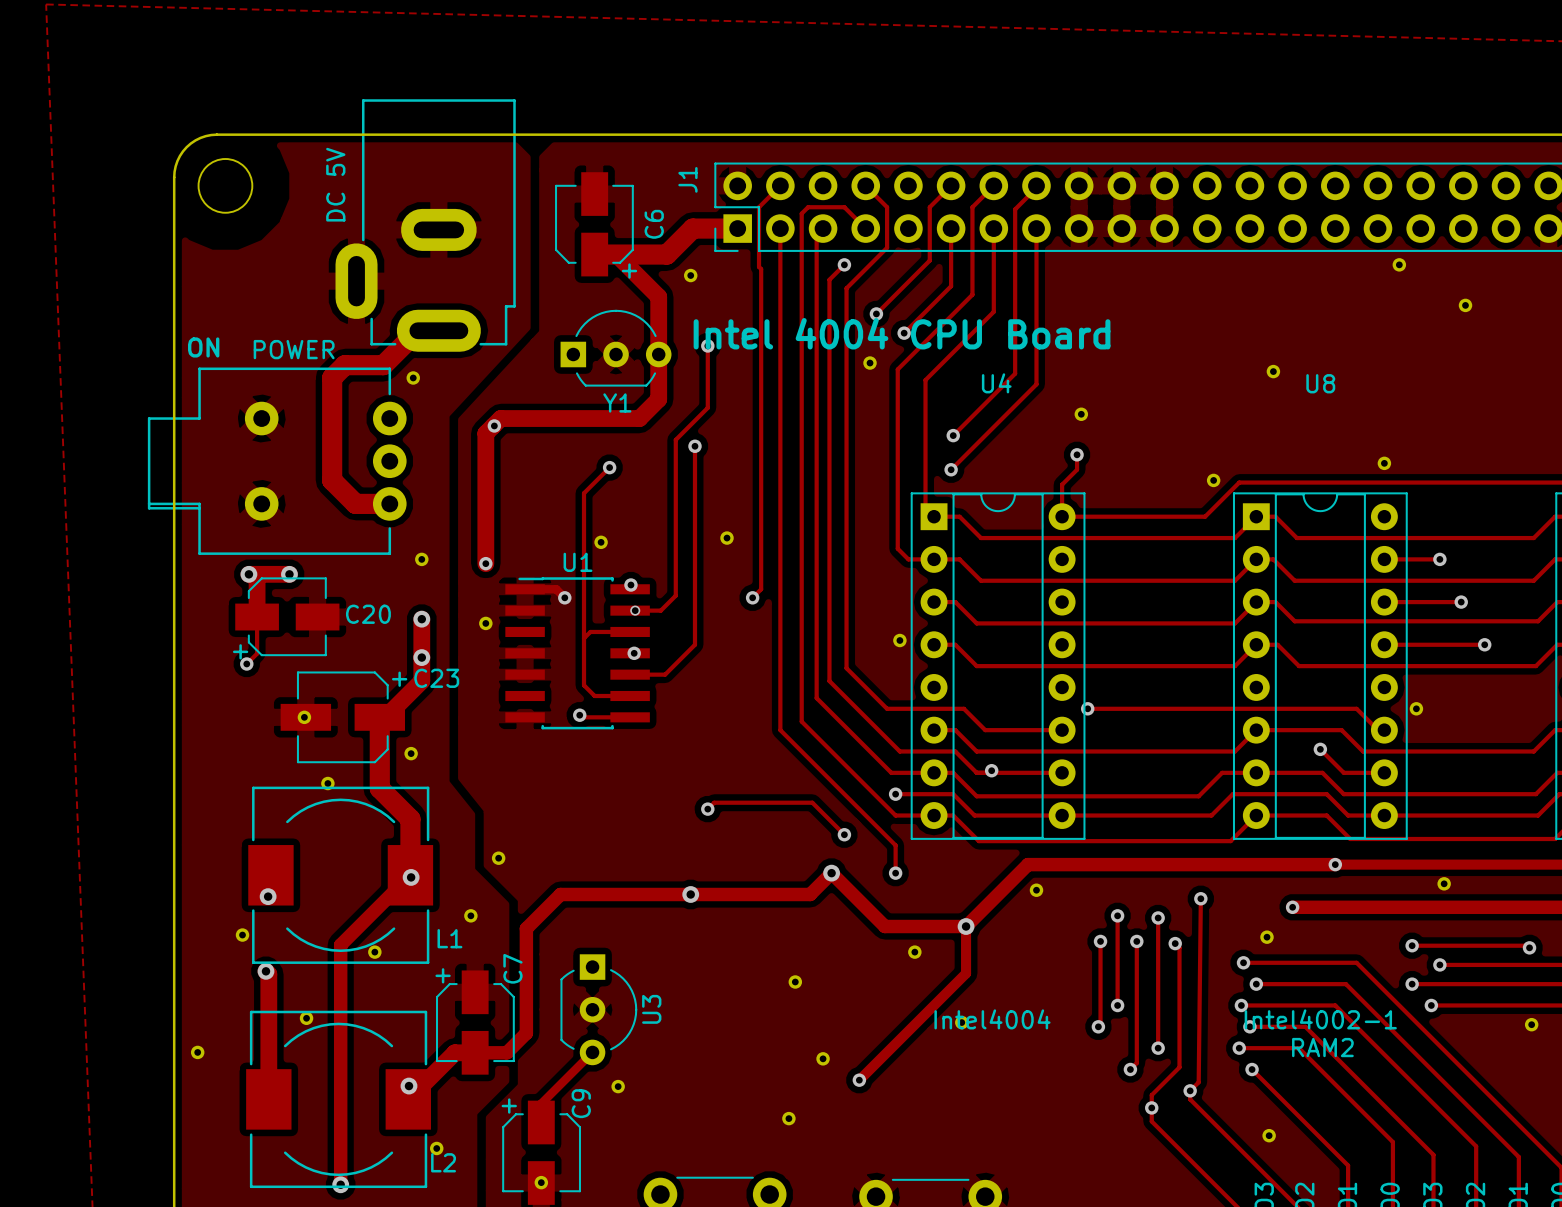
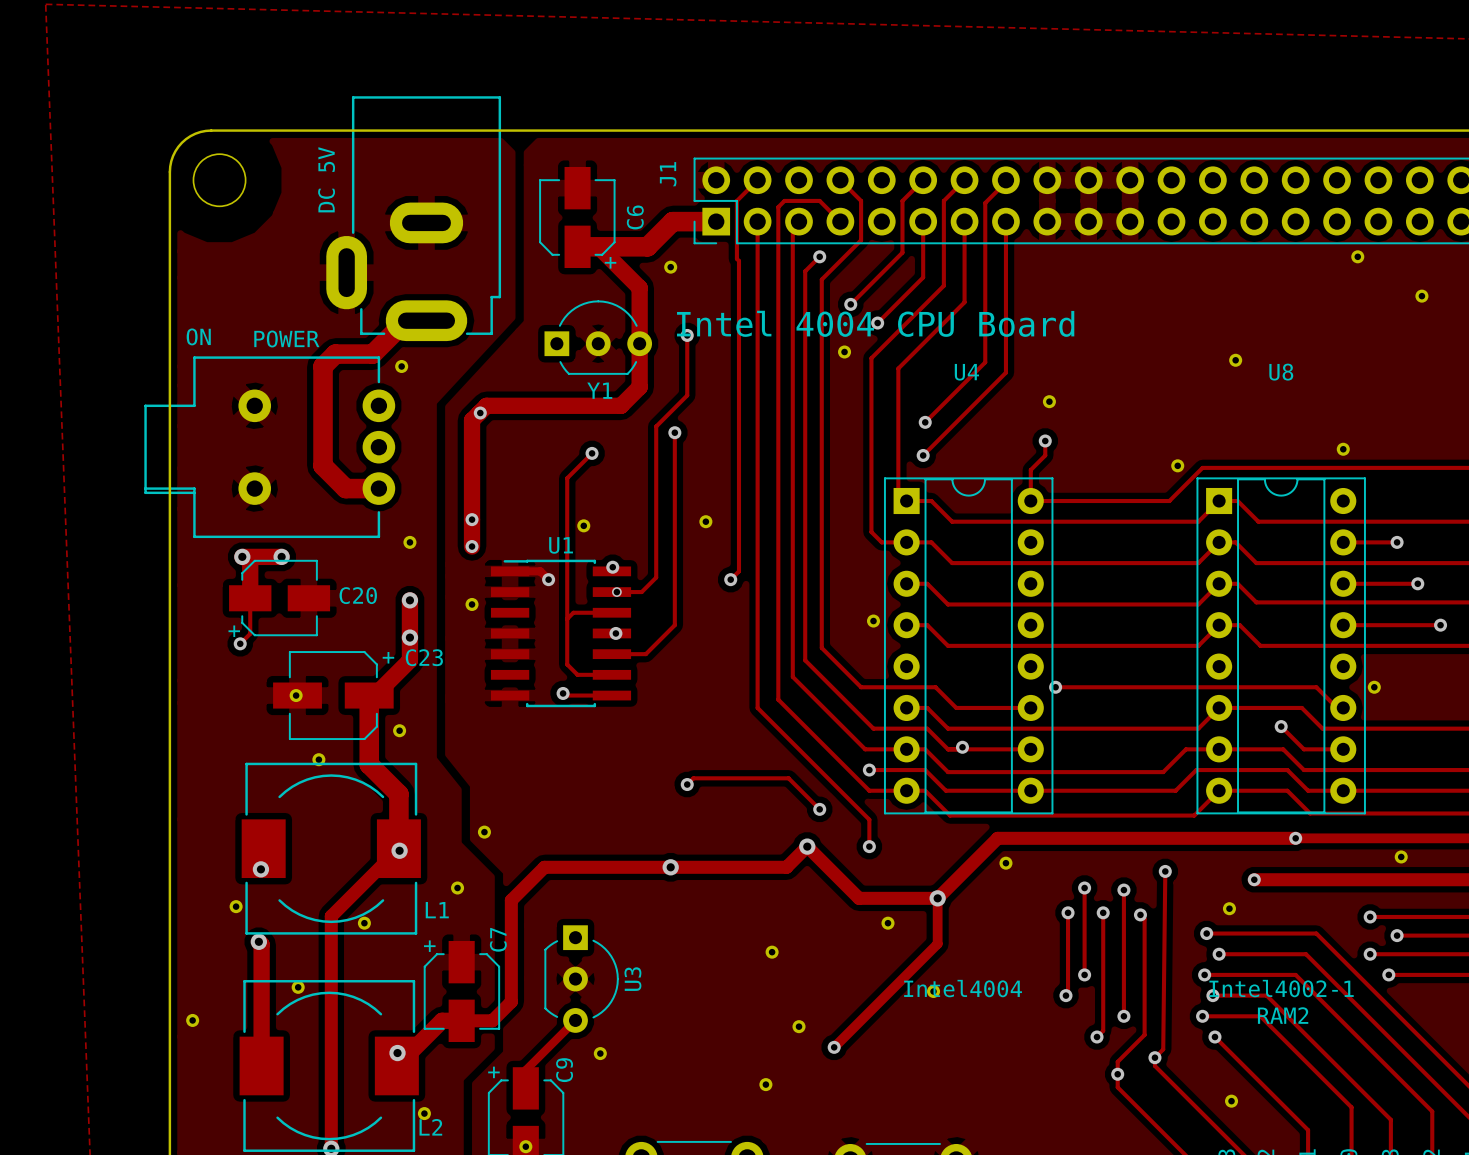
via: none -> (472, 519)

